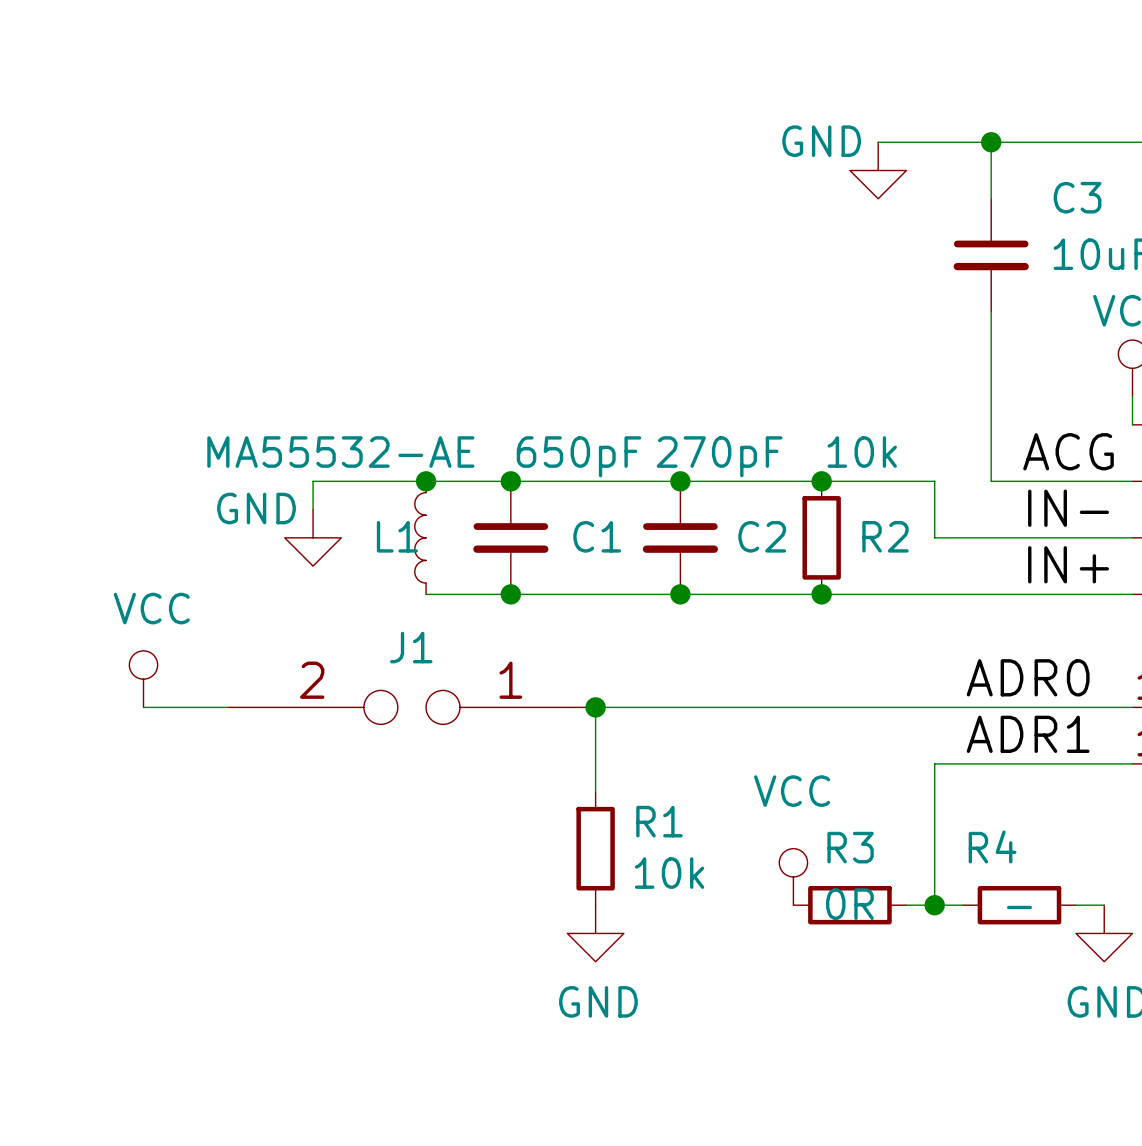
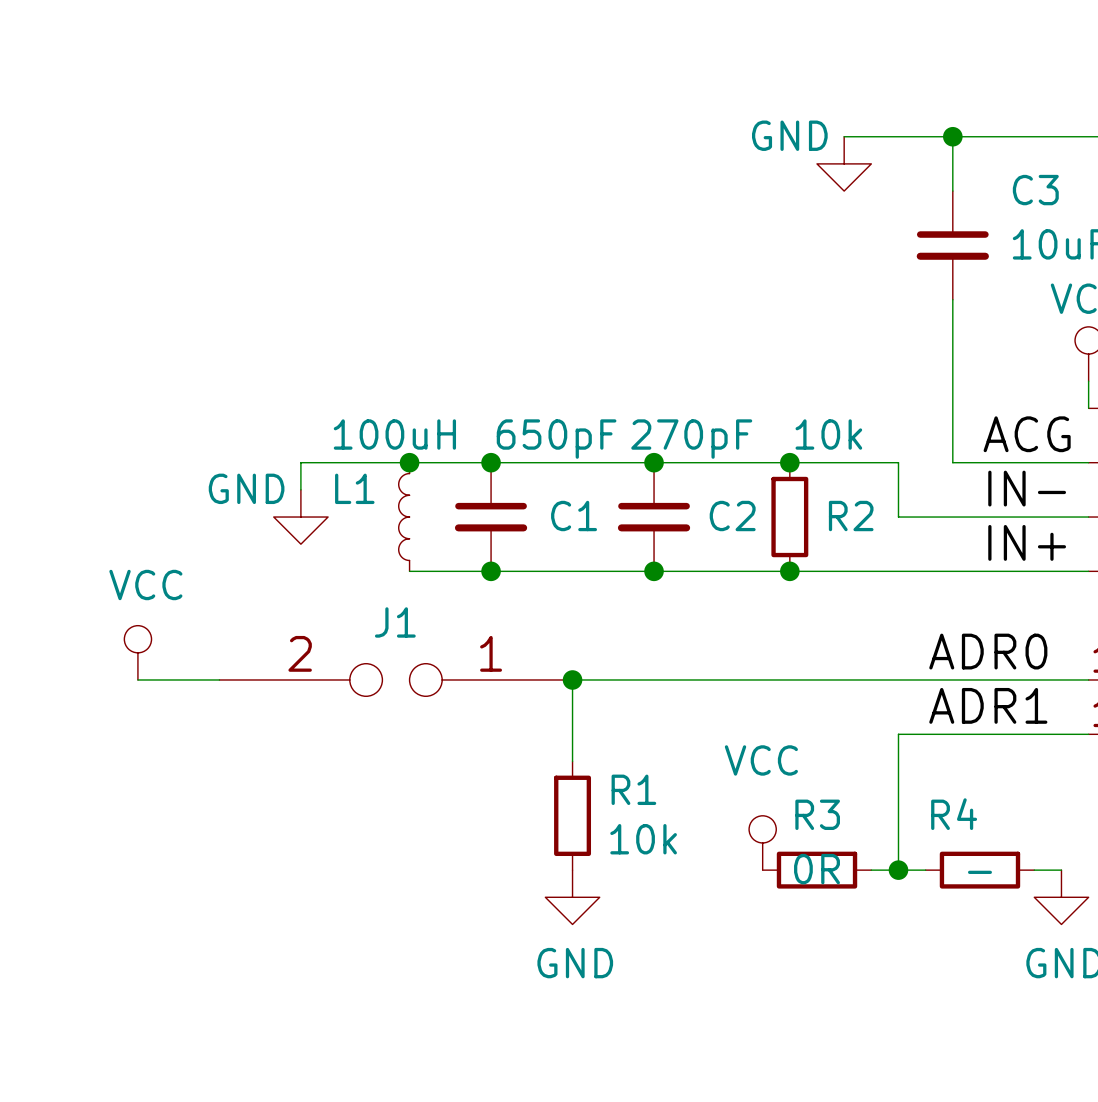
L1 value: MA55532-AE (340, 452) -> 100uH (394, 434)
L1 name position: L1 (397, 536) -> L1 (354, 488)

